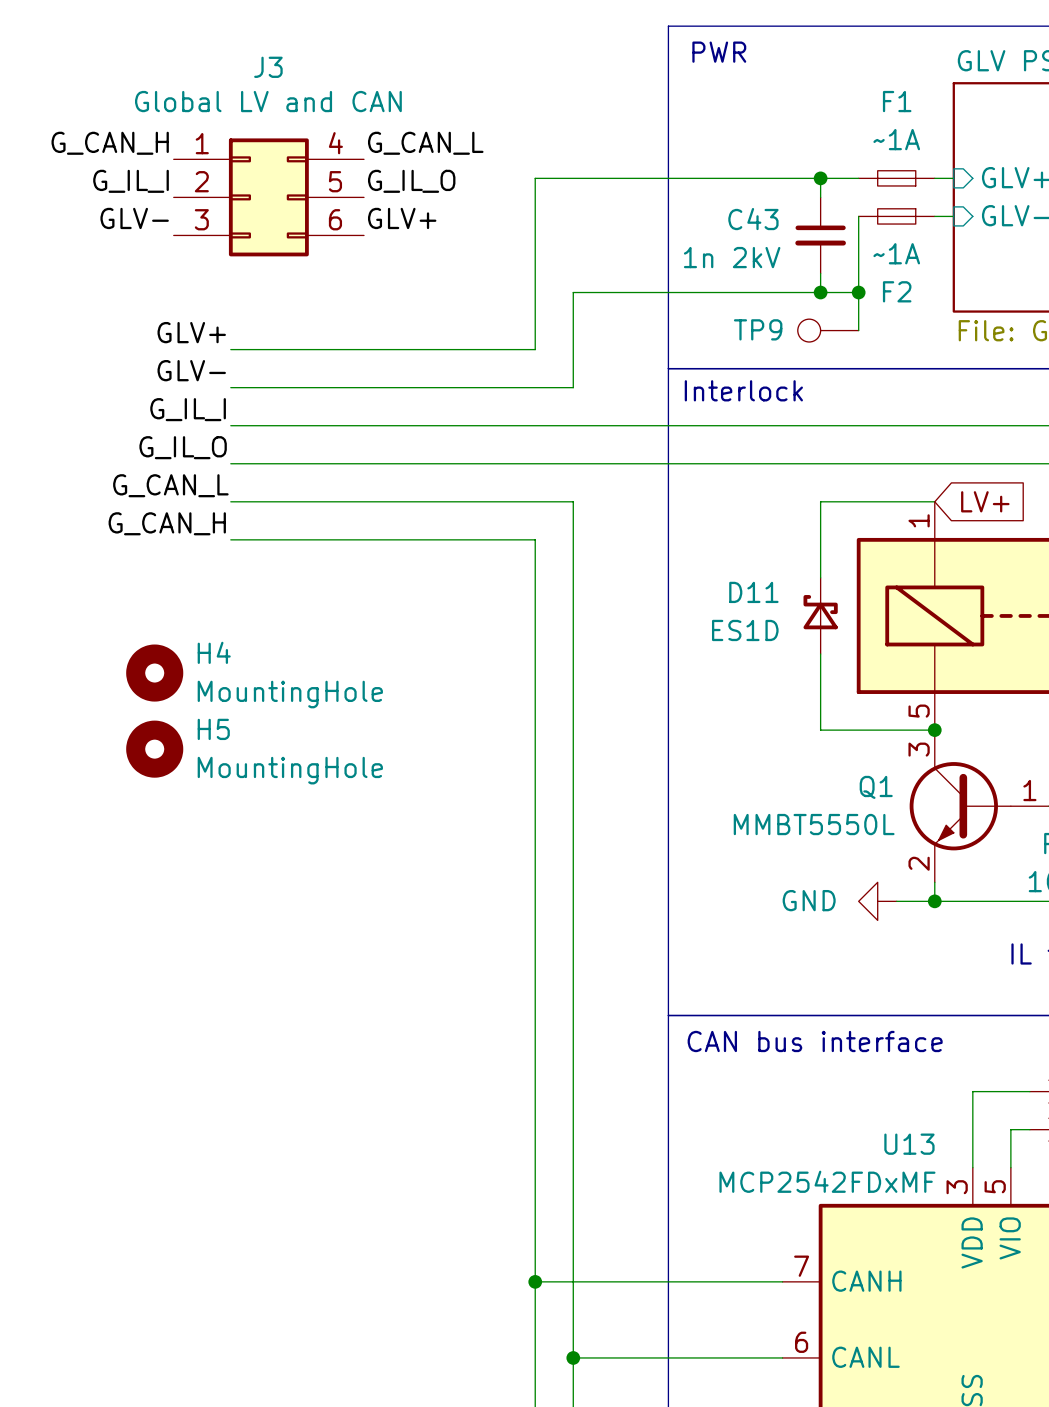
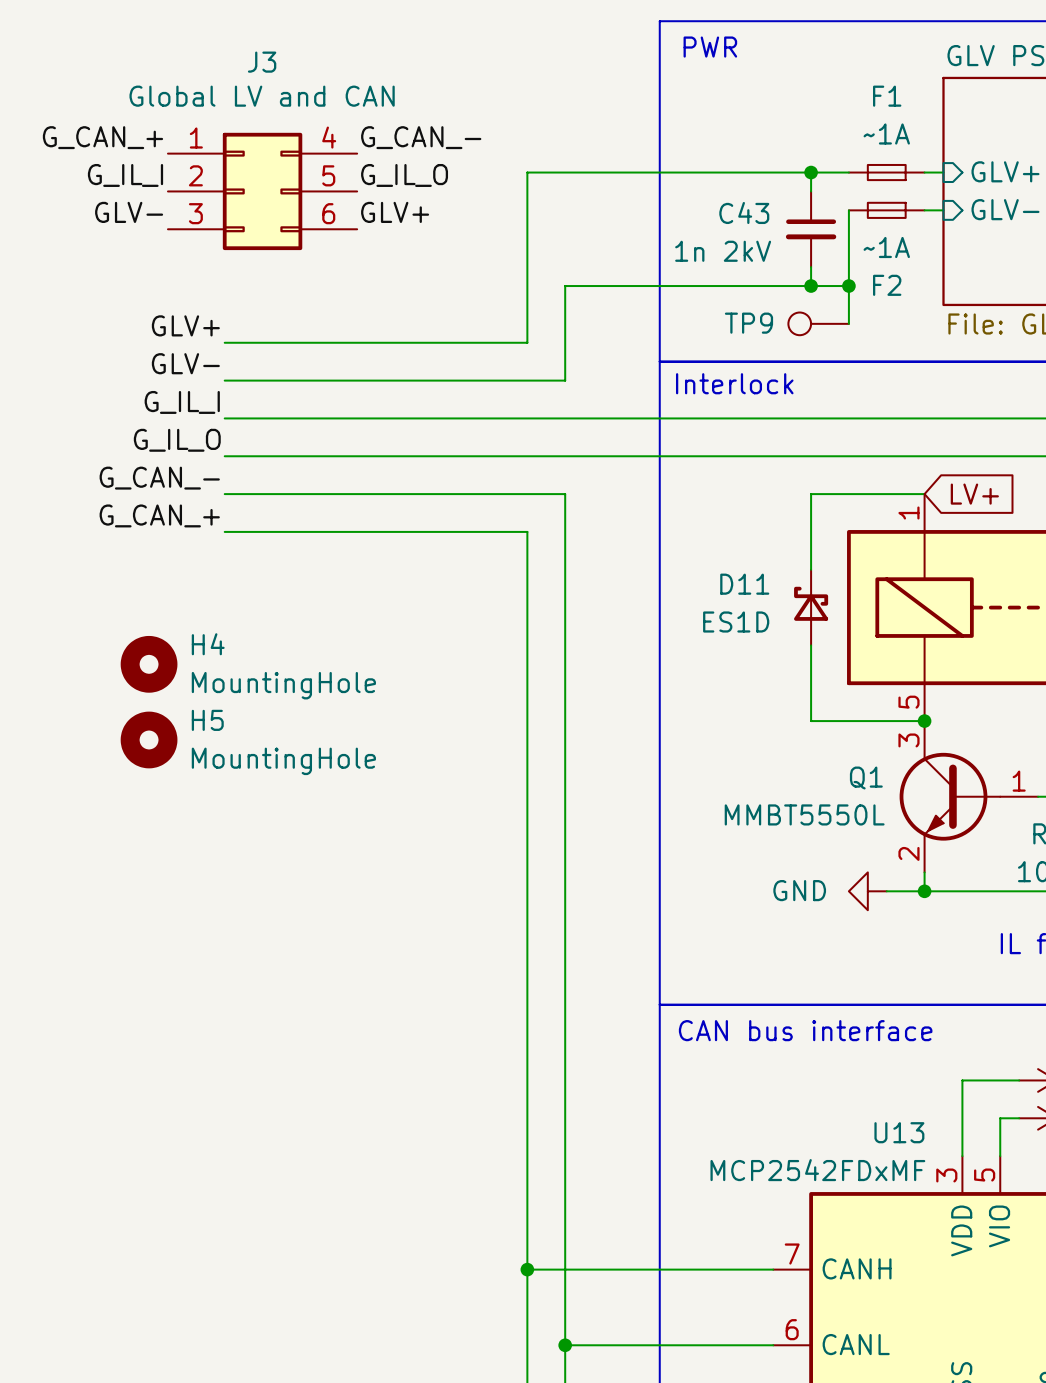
label: G_CAN_H (110, 143) -> G_CAN_+ (102, 137)
label: G_CAN_L (425, 143) -> G_CAN_- (421, 137)
label: G_CAN_L (170, 485) -> G_CAN_- (159, 478)
label: G_CAN_H (167, 523) -> G_CAN_+ (159, 515)

